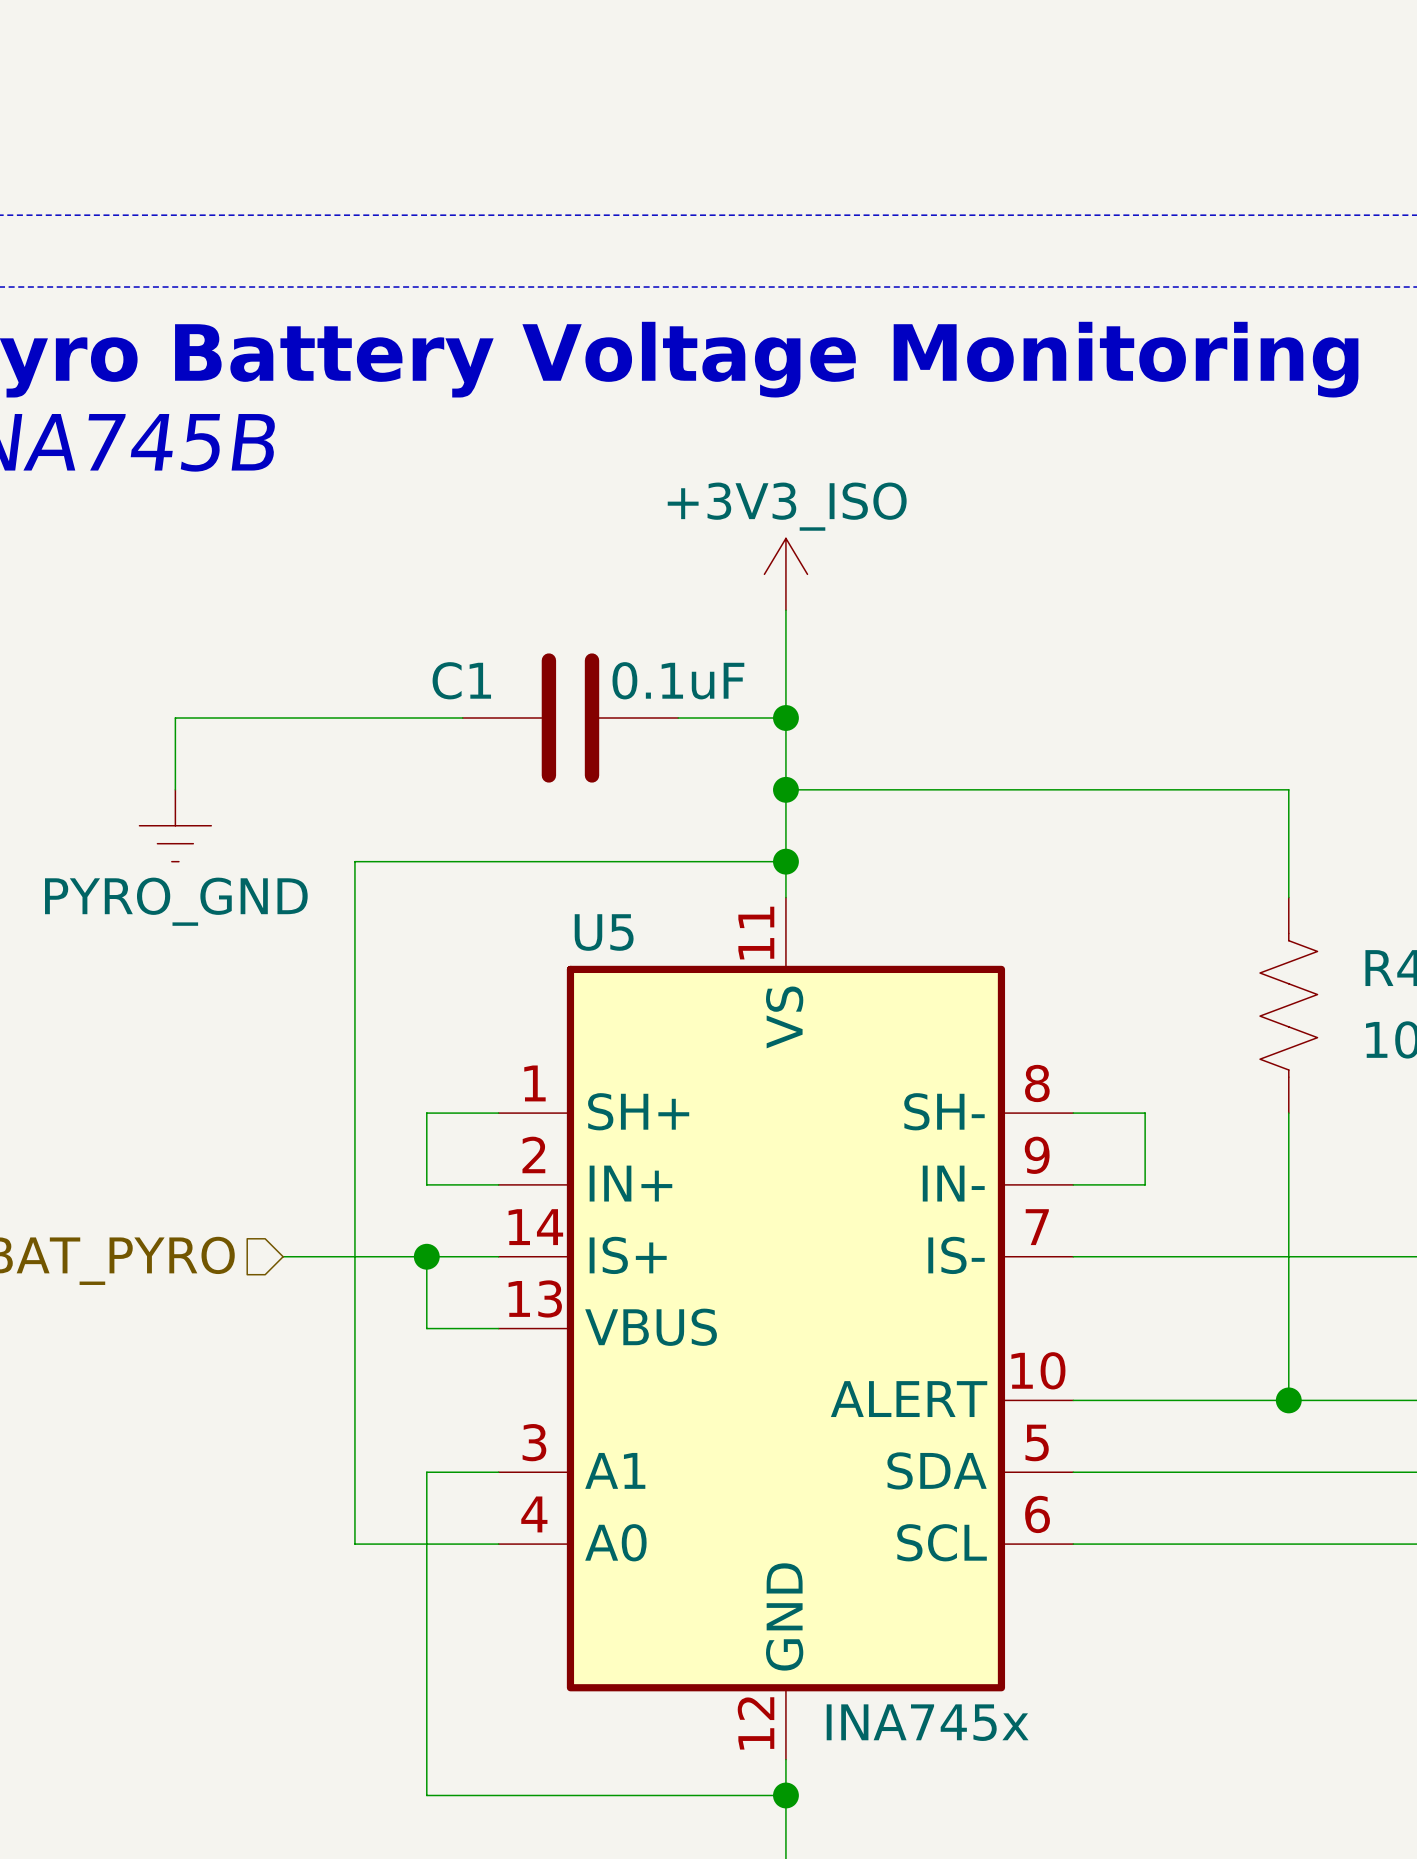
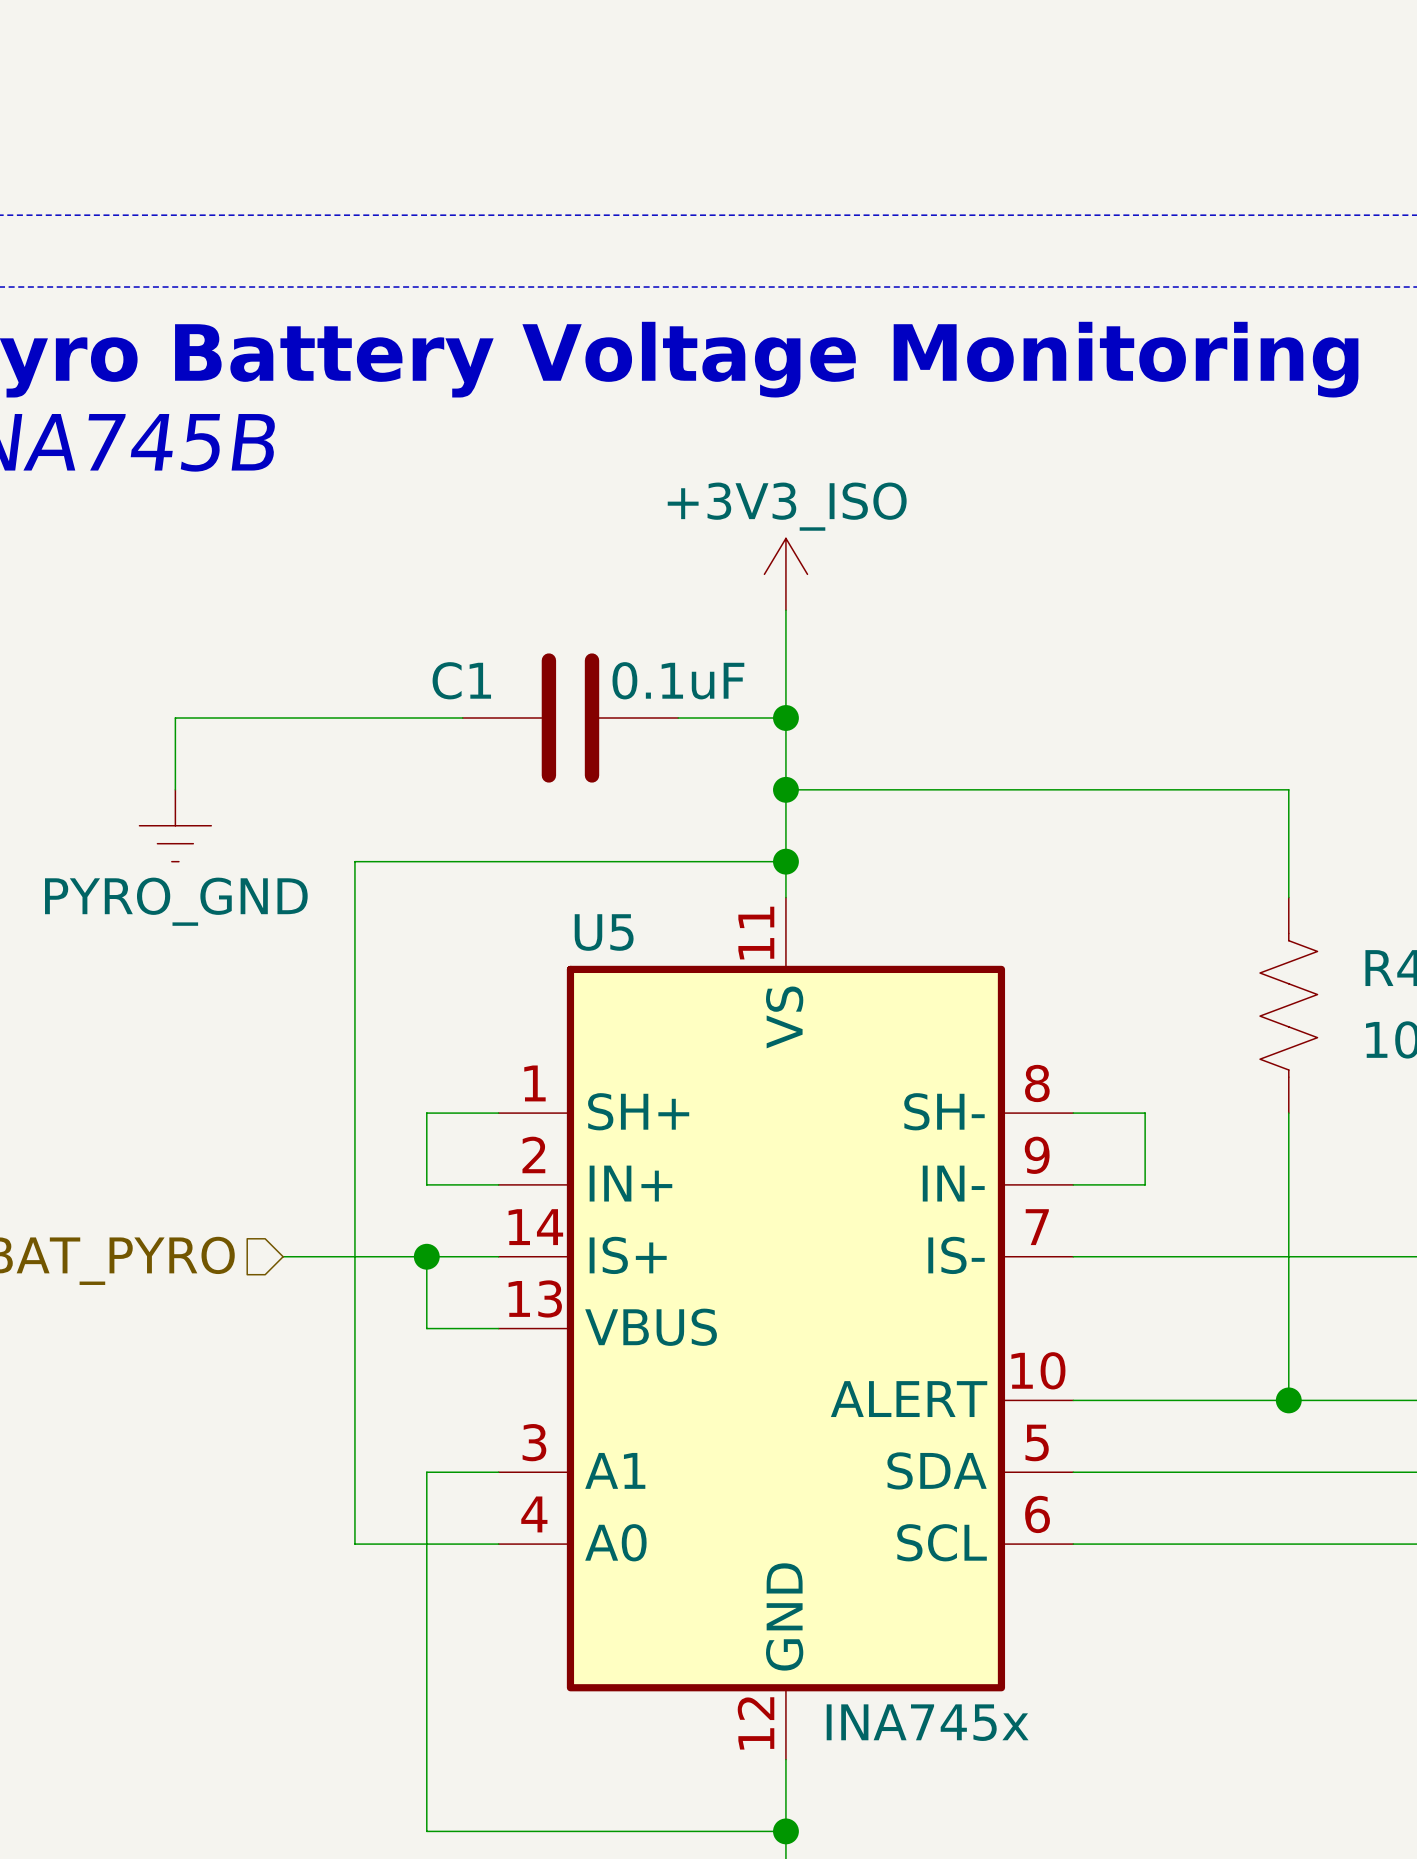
wire: (426, 1795) (785, 1795) -> (426, 1795) (426, 1831) (785, 1831)
junction position: (785, 1795) -> (785, 1831)

